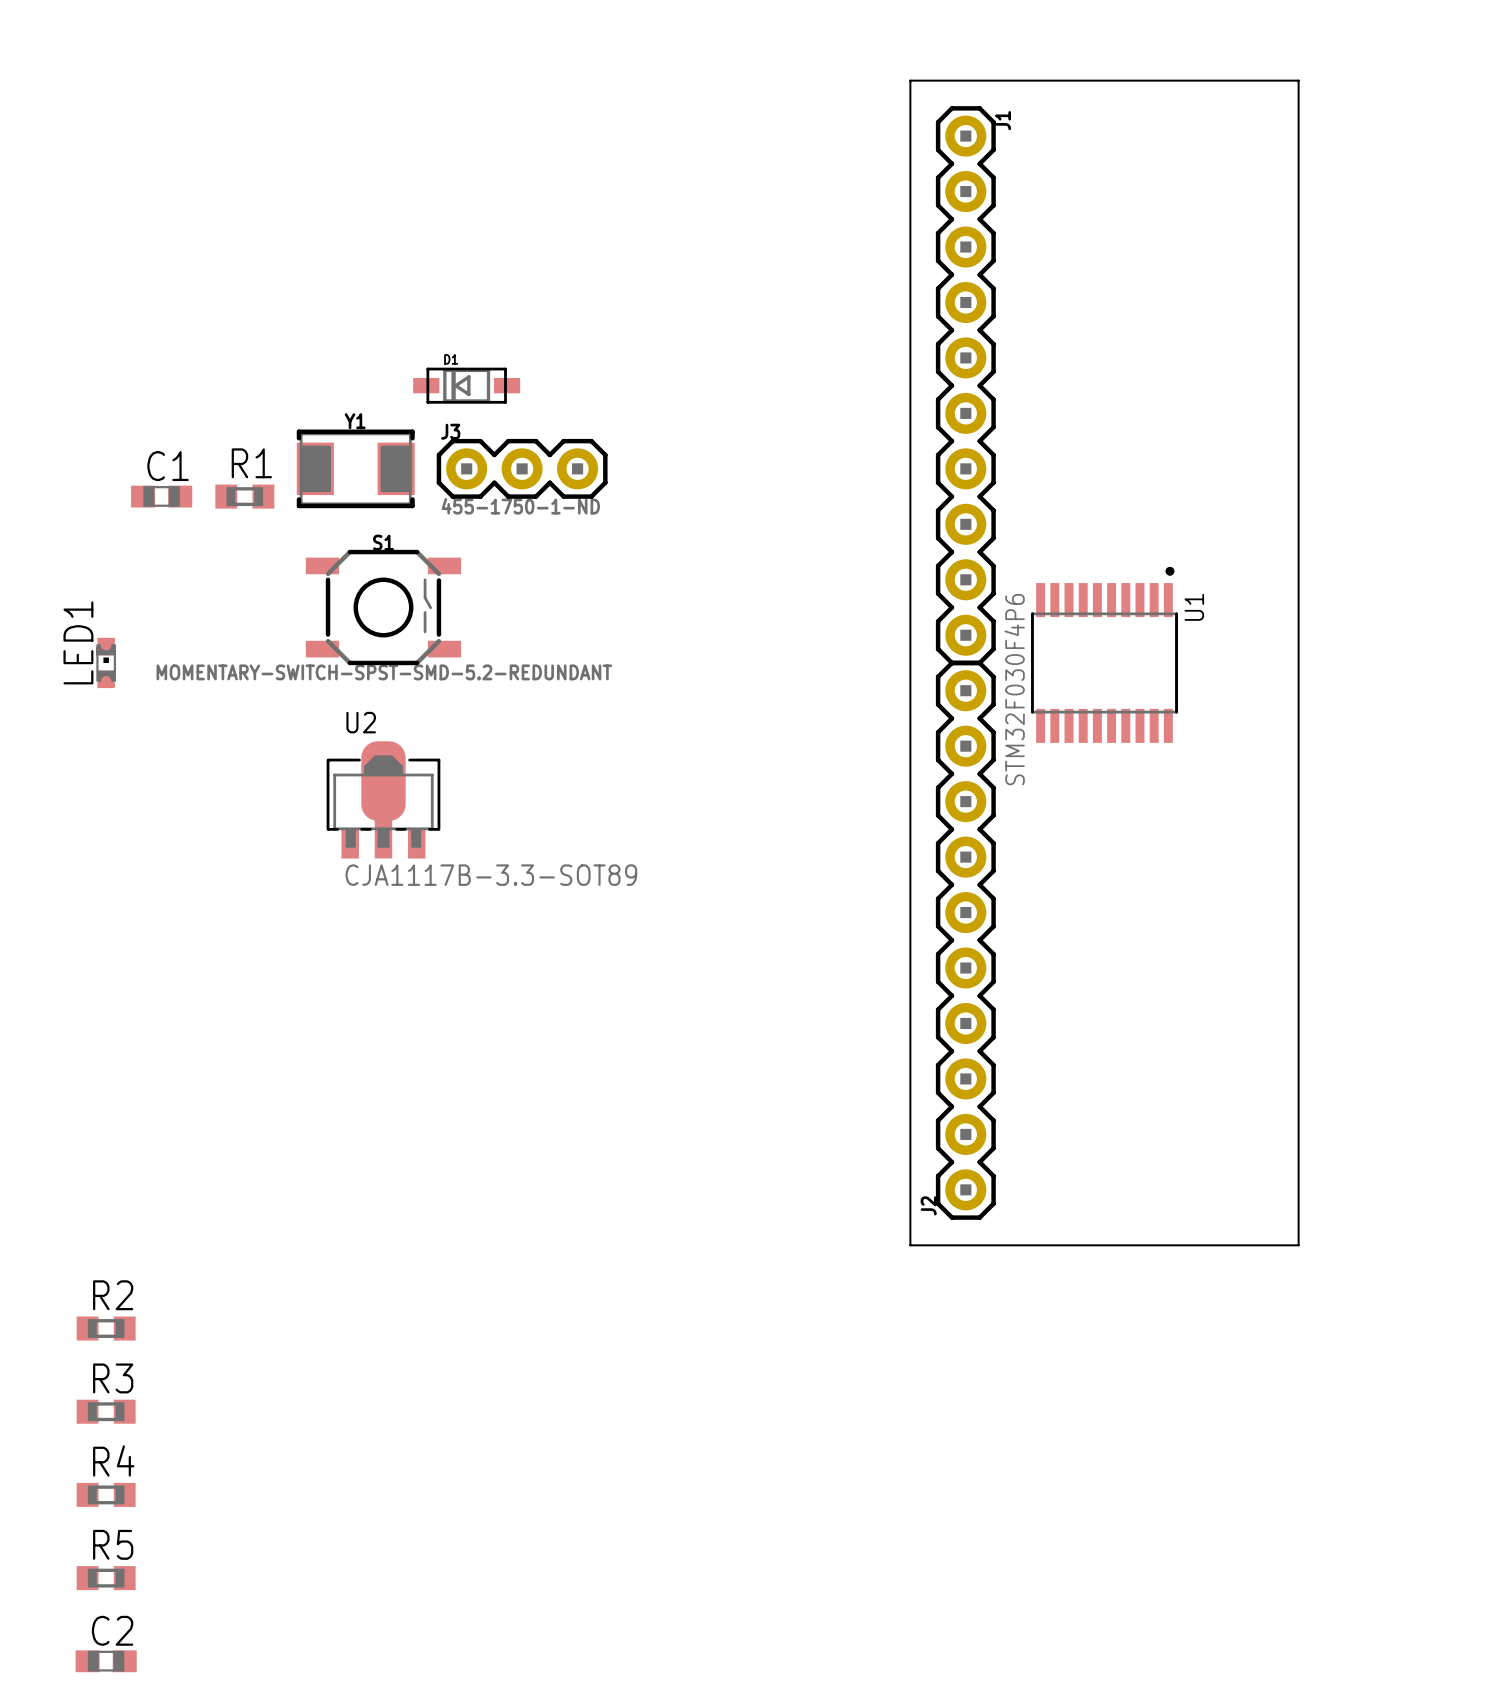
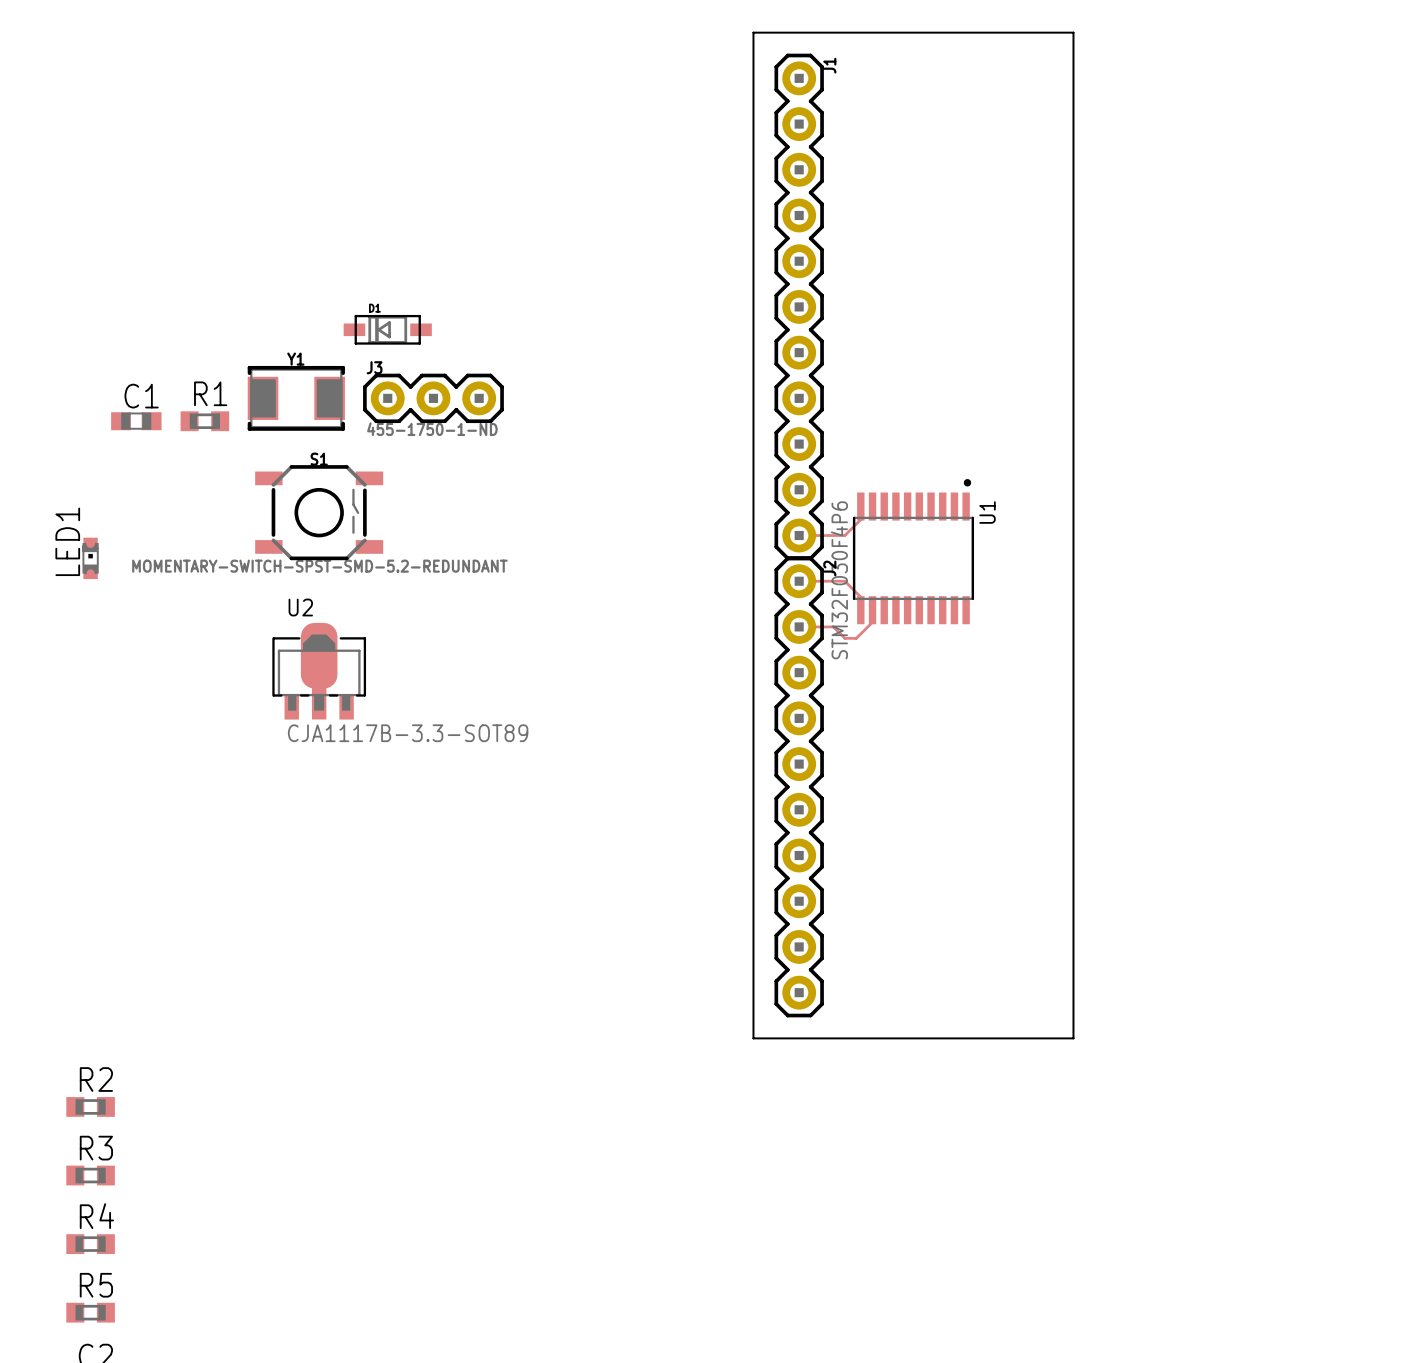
board edge: (910, 80) (1298, 80) -> (753, 78) (753, 32) (1073, 32) (1073, 78)
J1 footprint: [935, 106, 996, 666] -> [774, 53, 824, 561]
top track: none -> (860, 506) (860, 519) (844, 535) (799, 535)
top track: none -> (799, 581) (844, 581) (860, 597) (860, 610)
top track: none -> (872, 610) (872, 622) (856, 638) (844, 638) (833, 626) (799, 626)
J2 name position: J2 (928, 1205) -> J2 (829, 568)

